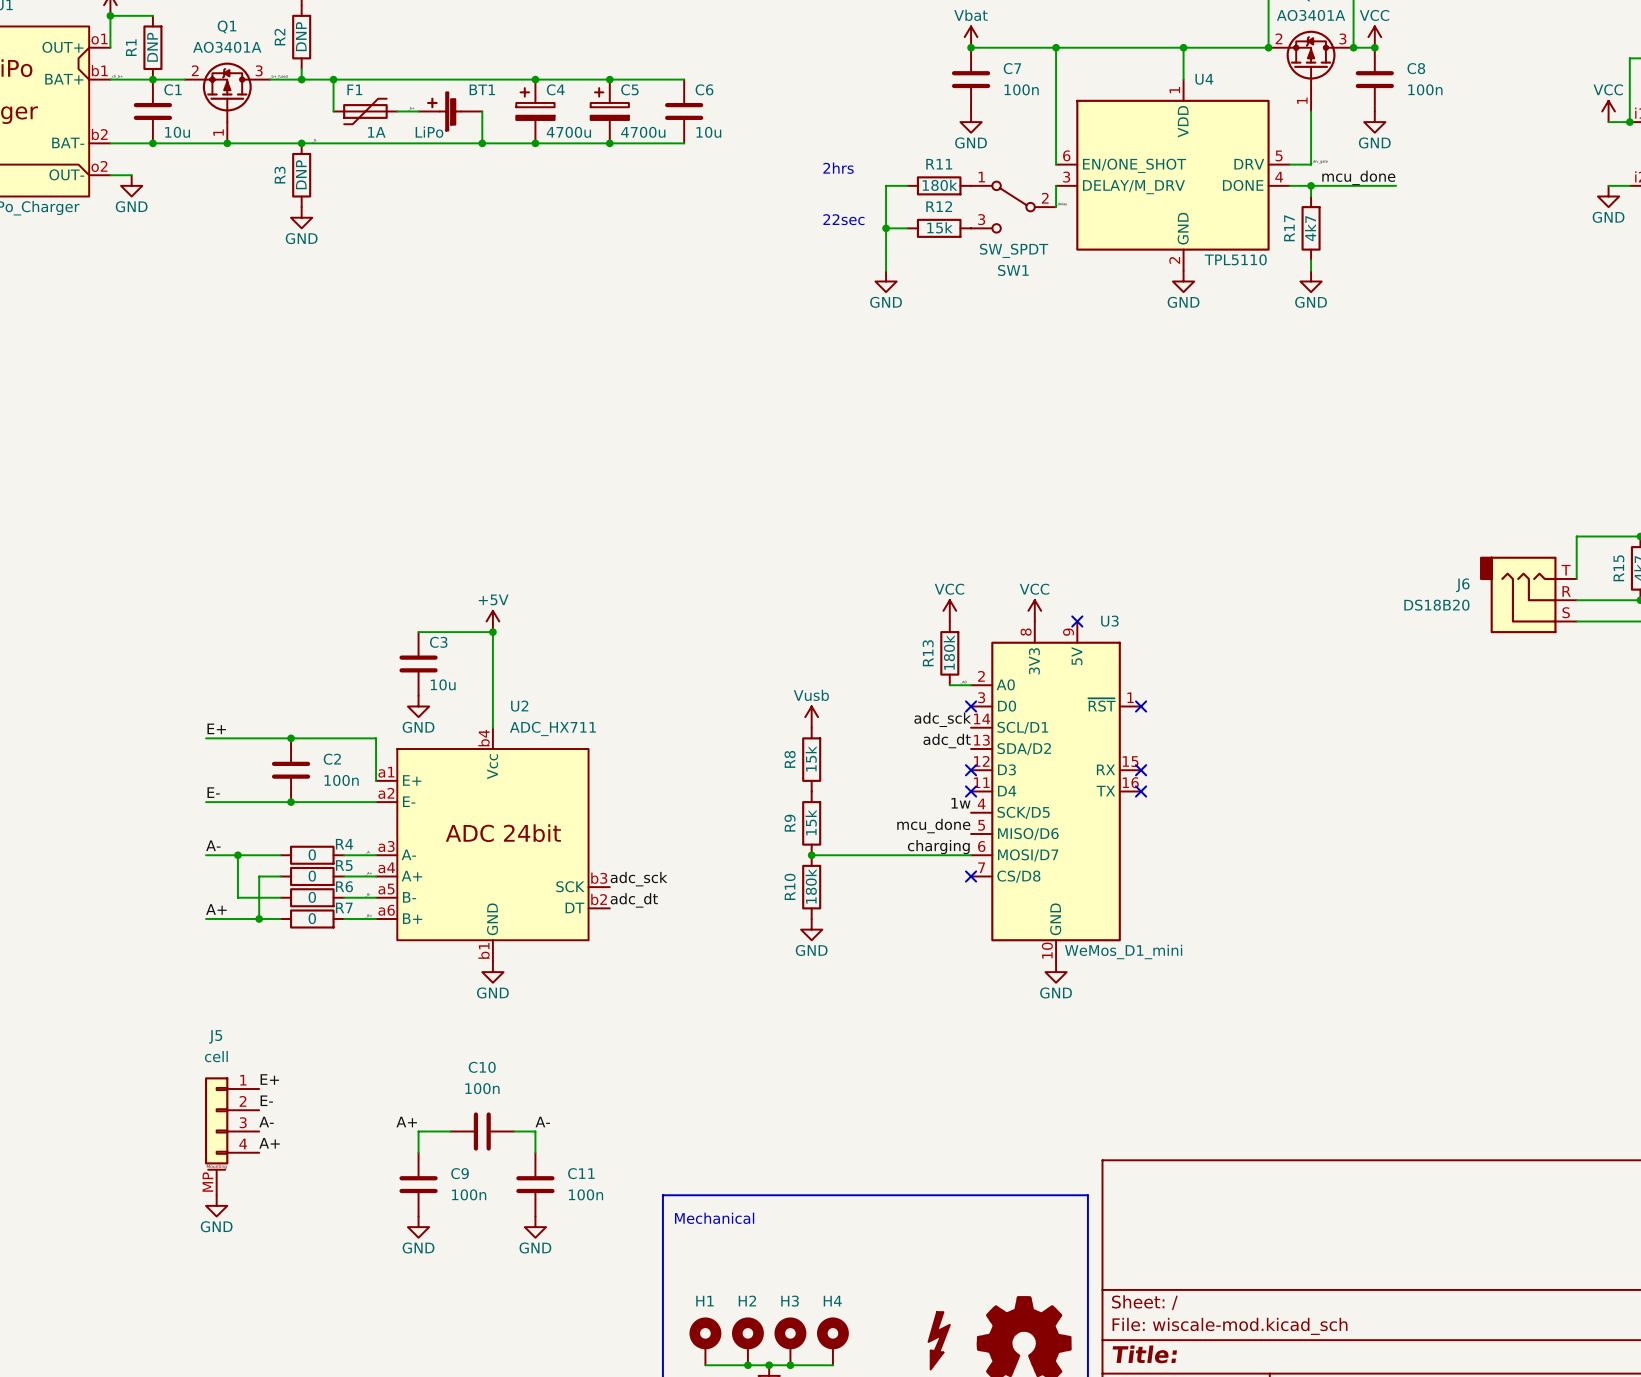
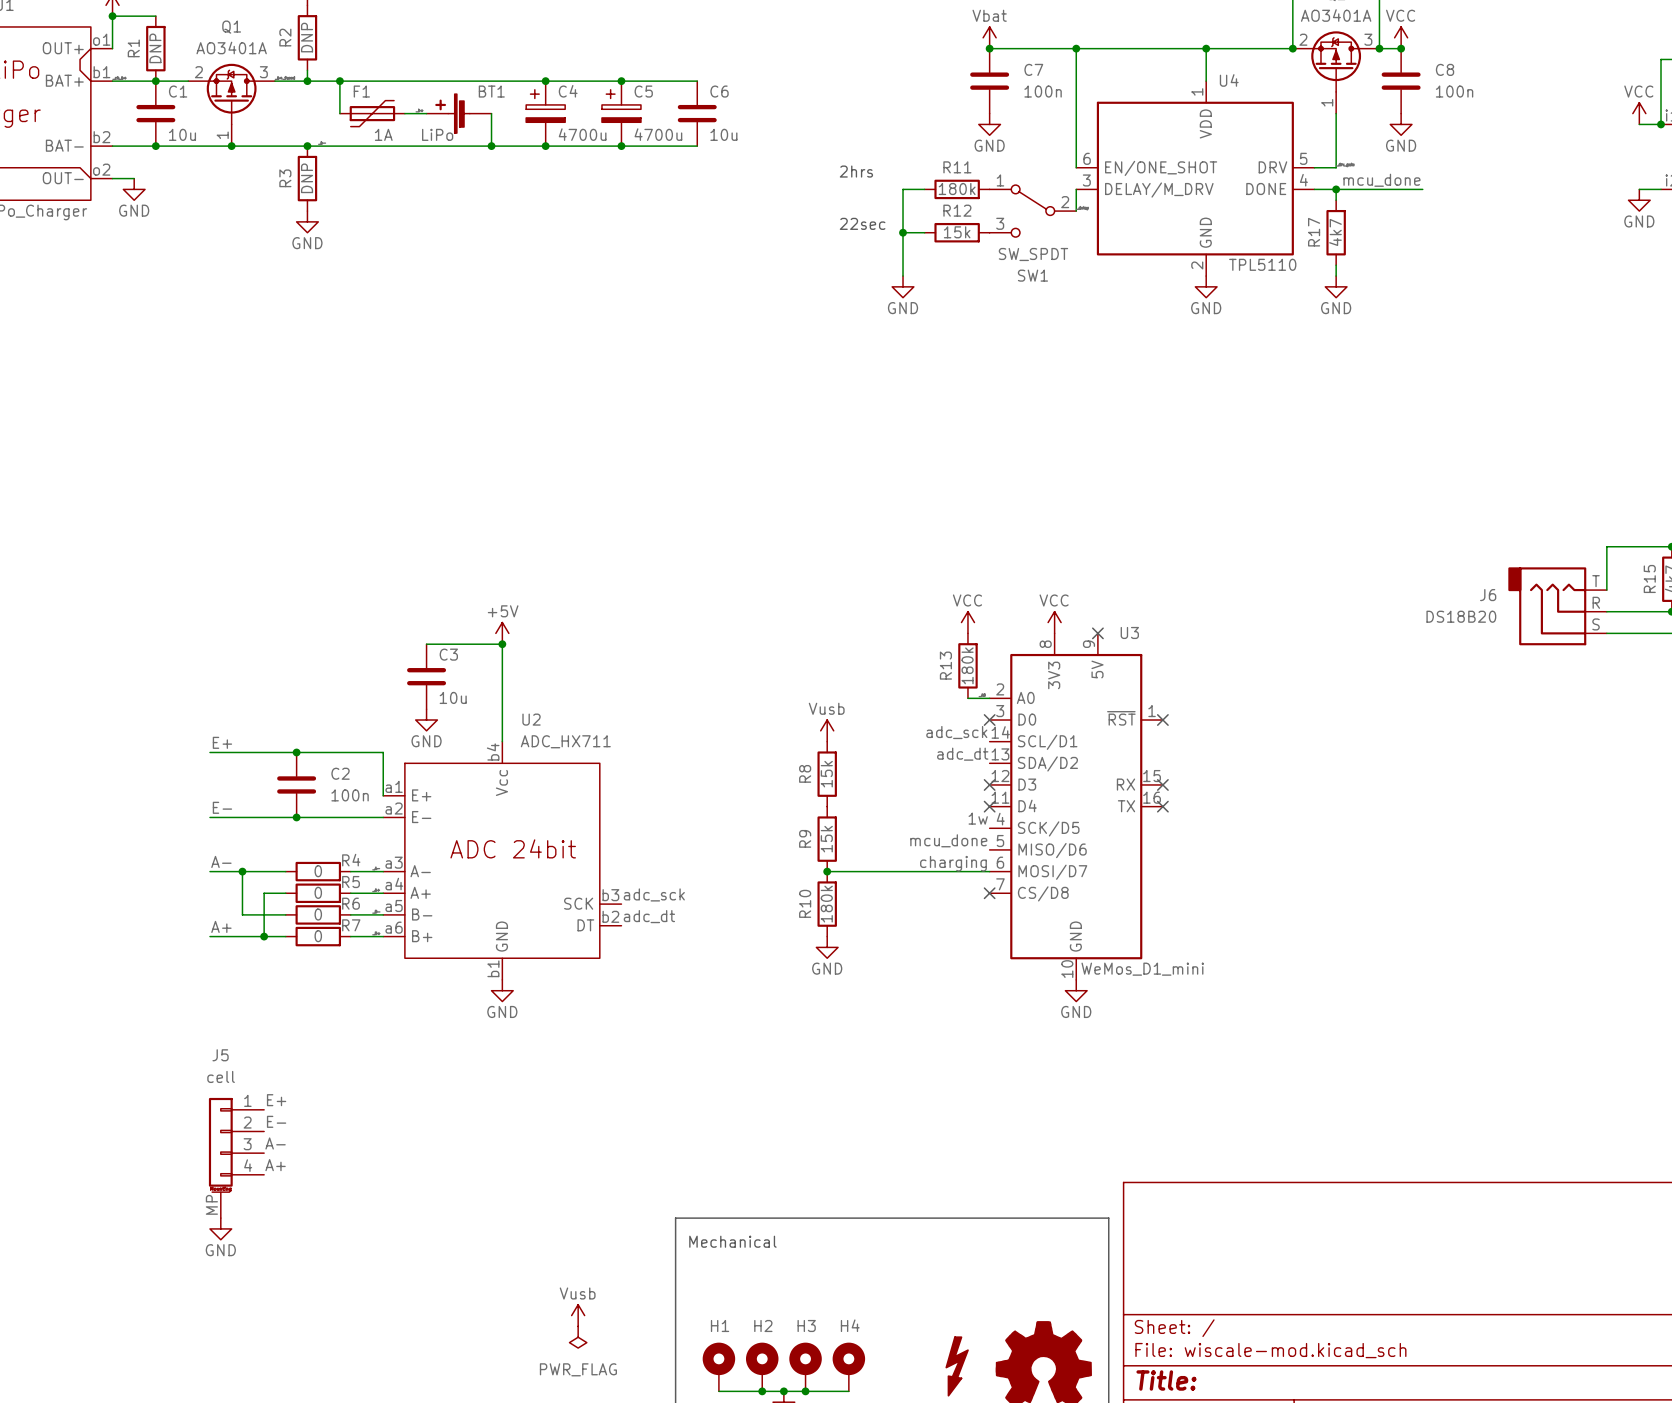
label: A+ (406, 1122) -> none
label: A- (542, 1122) -> none
wire: (450, 1131) (418, 1131) (418, 1152) -> none
C10: 100n (482, 1131) -> none
wire: (514, 1131) (535, 1131) (535, 1152) -> none
C9: 100n (418, 1184) -> none
C11: 100n (535, 1184) -> none
power symbol: GND (418, 1227) -> none
power symbol: GND (535, 1227) -> none
power symbol: none -> Vusb (578, 1315)
power symbol: none -> PWR_FLAG (578, 1337)

